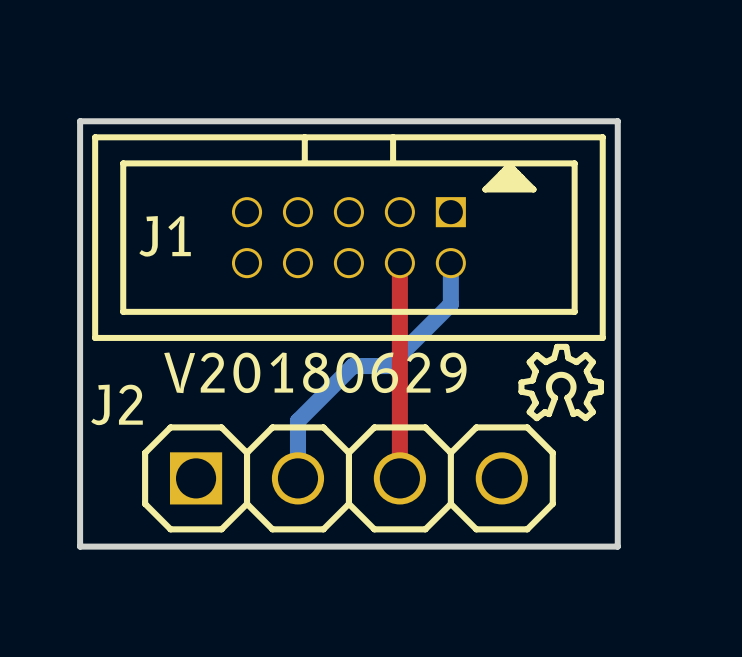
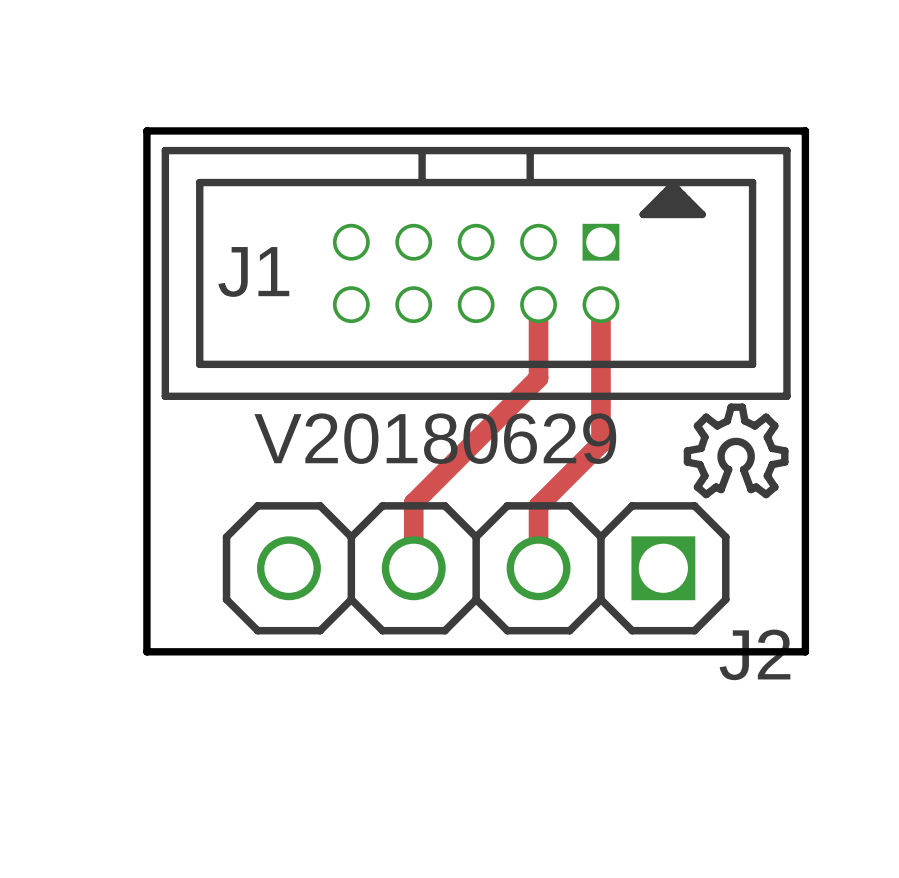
bottom track: (450, 263) (450, 304) (389, 366) (352, 366) (297, 421) (297, 478) -> none
top track: (399, 323) (399, 427) -> (600, 304) (600, 443) (538, 505)
top track: none -> (538, 378) (413, 502) (413, 568)
J2 rotation: 0° (348, 478) -> 180° (476, 568)

